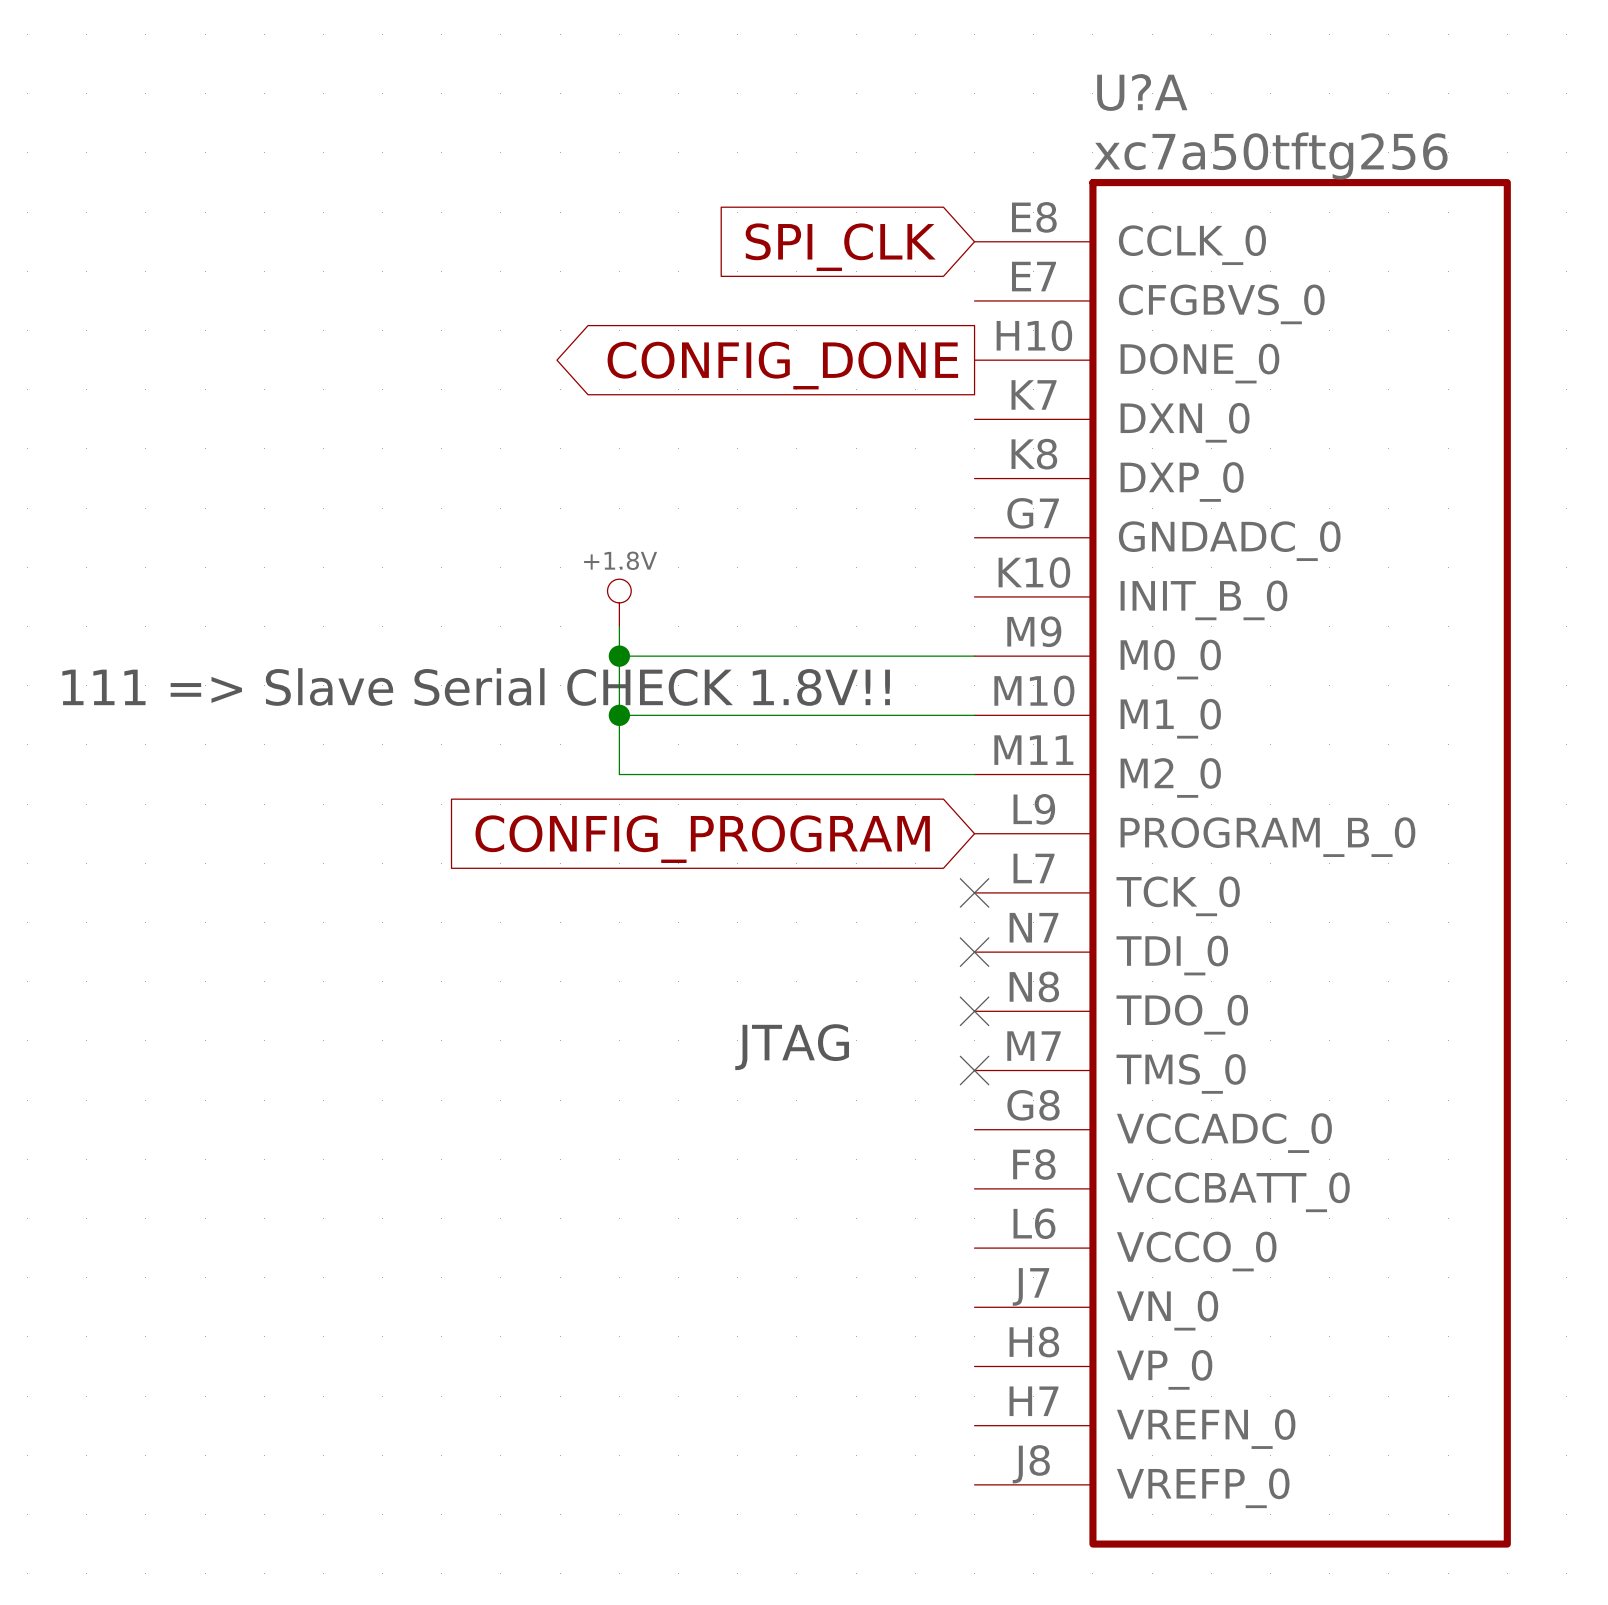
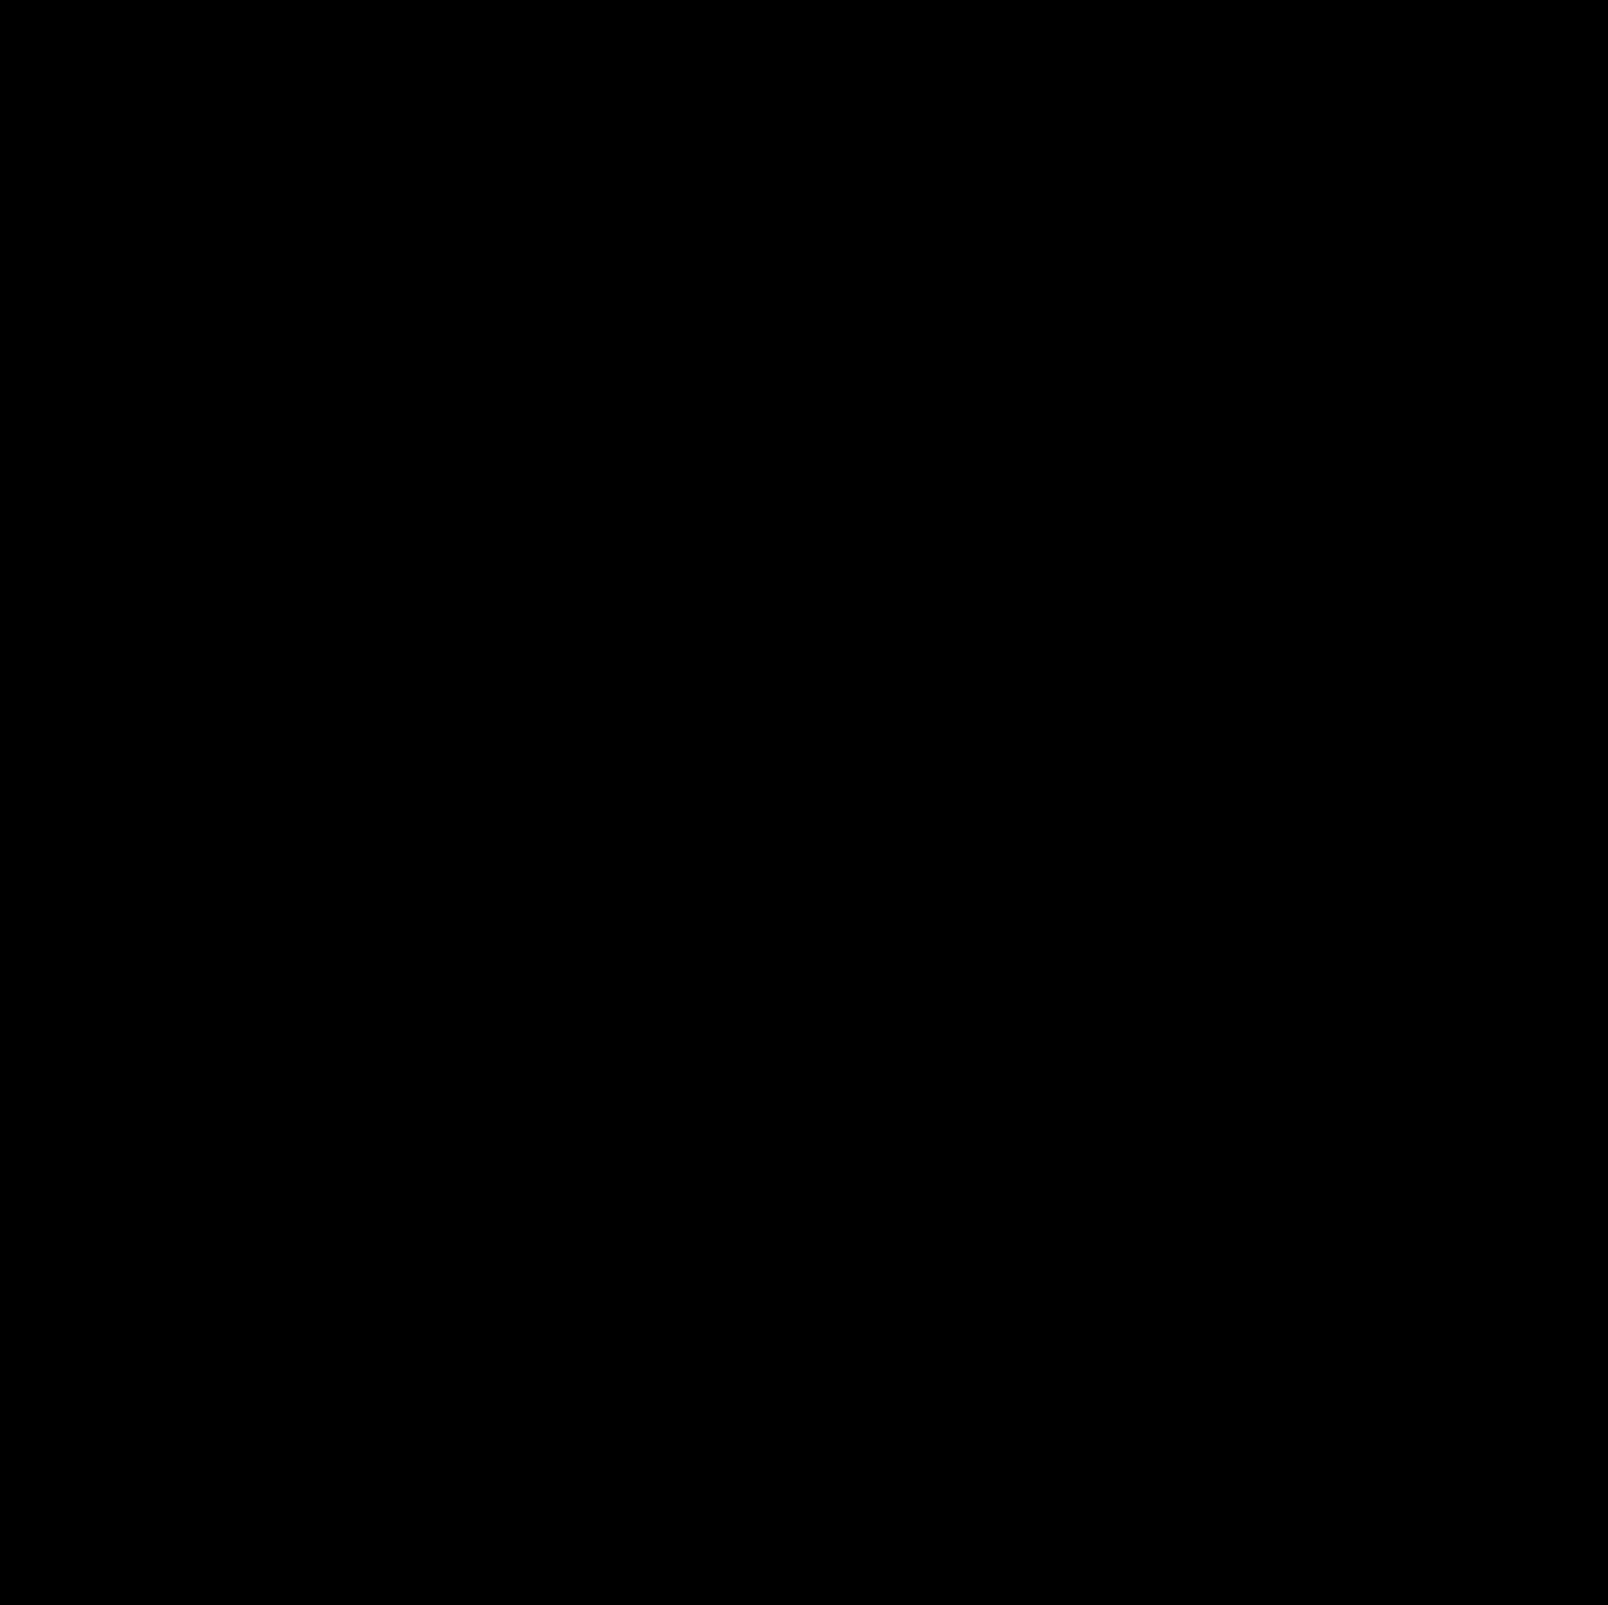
global label: SPI_CLK (840, 247) -> none
global label: CONFIG_DONE (782, 365) -> none
power symbol: +1.8V (619, 602) -> none
wire: (619, 626) (619, 774) (974, 774) -> none
wire: (619, 656) (974, 656) -> none
junction: (619, 656) -> none
text: 111 => Slave Serial CHECK 1.8V!! (476, 687) -> none
wire: (619, 715) (974, 715) -> none
junction: (619, 715) -> none
global label: CONFIG_PROGRAM (702, 839) -> none
U?A: xc7a50tftg256 (1242, 863) -> none
no-connect mark: (974, 892) -> none
no-connect mark: (974, 952) -> none
no-connect mark: (974, 1011) -> none
text: JTAG (792, 1047) -> none
no-connect mark: (974, 1070) -> none

